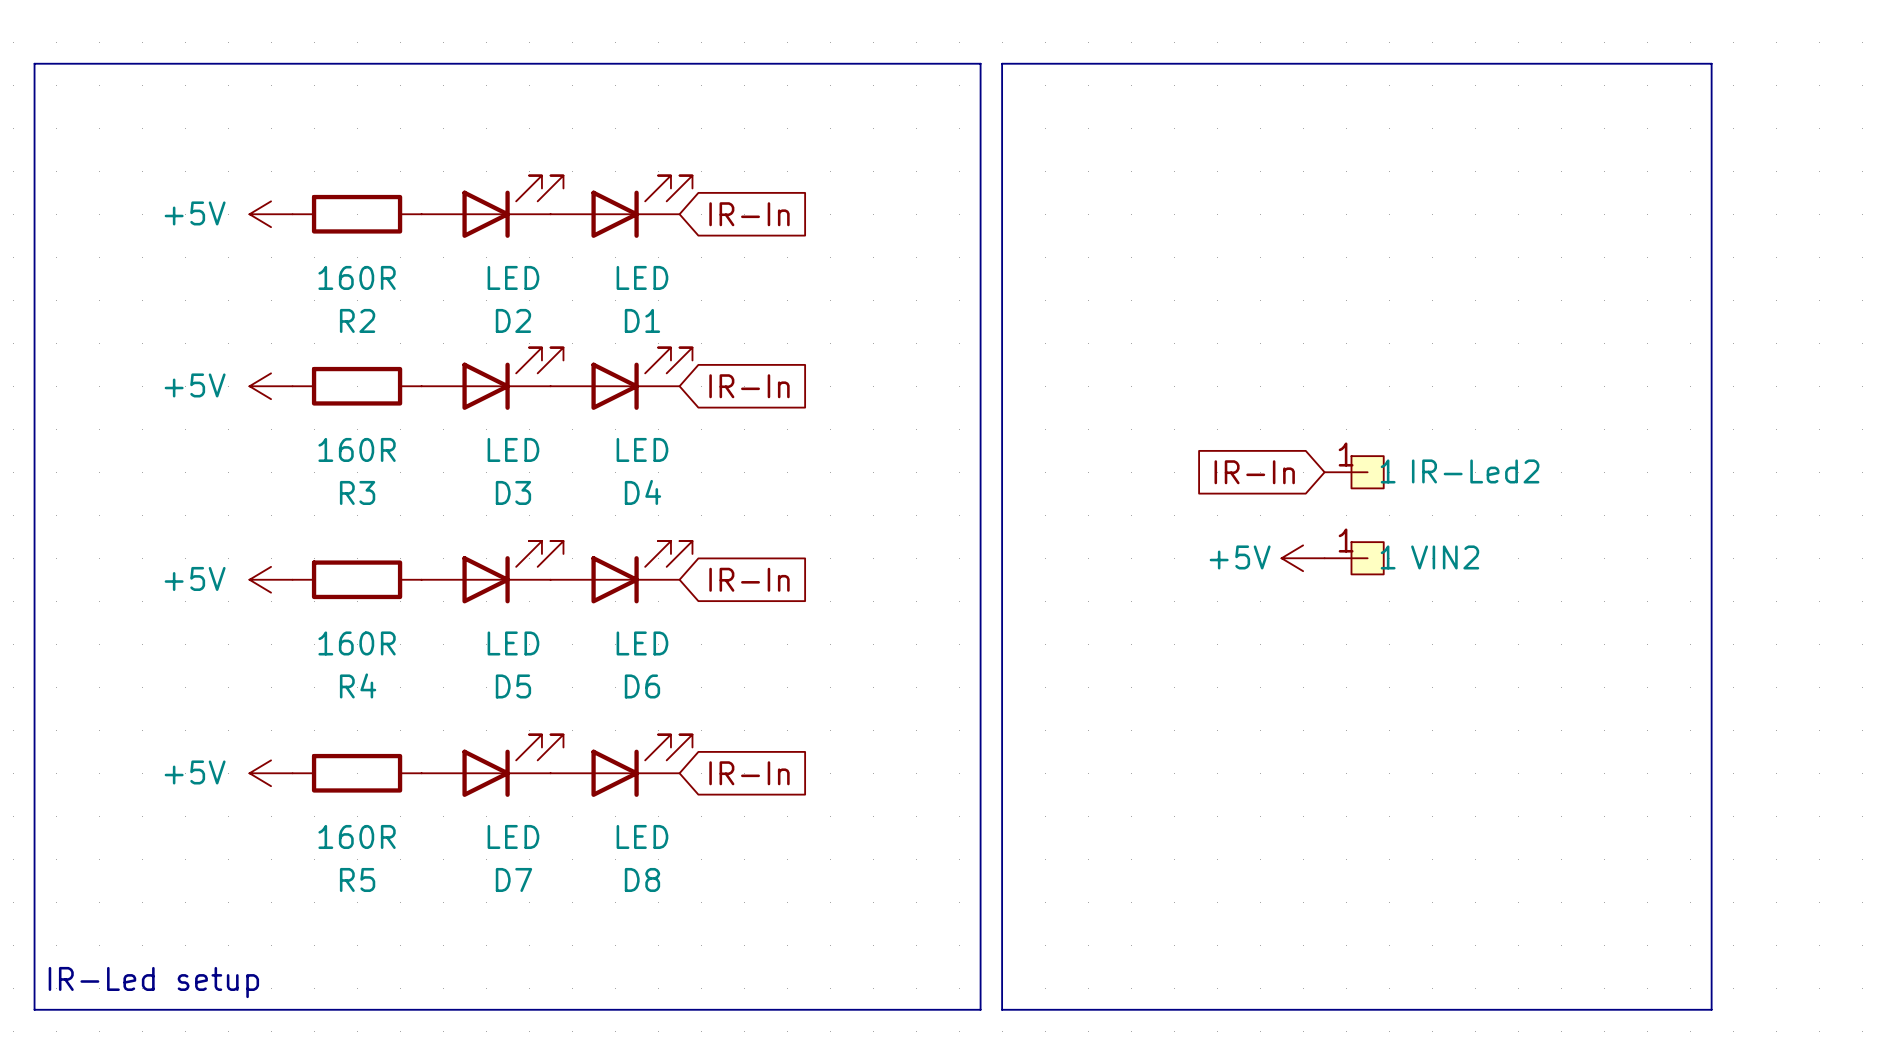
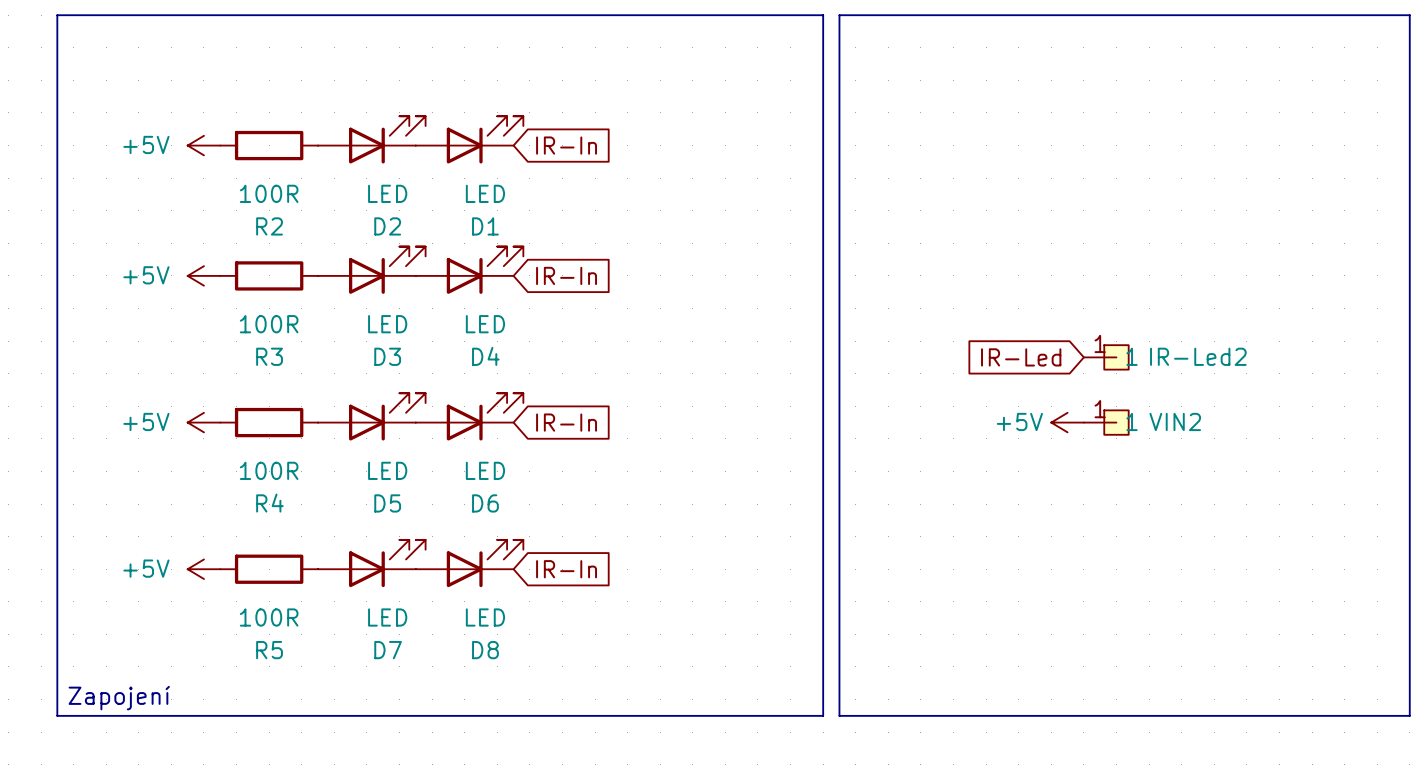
line: (34, 63) (980, 63) (980, 1009) (34, 1009) (34, 63) -> (57, 15) (57, 715) (823, 715) (823, 15) (57, 15)
line: (1002, 63) (1711, 63) (1711, 1009) (1002, 1009) (1002, 63) -> (839, 15) (839, 715) (1409, 715) (1409, 15) (839, 15)
R2 value: 160R (357, 277) -> 100R (269, 193)
R3 value: 160R (357, 449) -> 100R (269, 324)
global label: IR-In (1254, 472) -> none
IR-Led2 position: (1354, 472) -> (1106, 357)
global label: none -> IR-Led (1021, 357)
power symbol position: +5V (1303, 558) -> +5V (1067, 422)
VIN2 position: (1354, 558) -> (1106, 422)
R4 value: 160R (357, 643) -> 100R (269, 470)
R5 value: 160R (357, 836) -> 100R (269, 617)
text: none -> Zapojení (119, 698)
text: IR-Led setup (153, 982) -> none

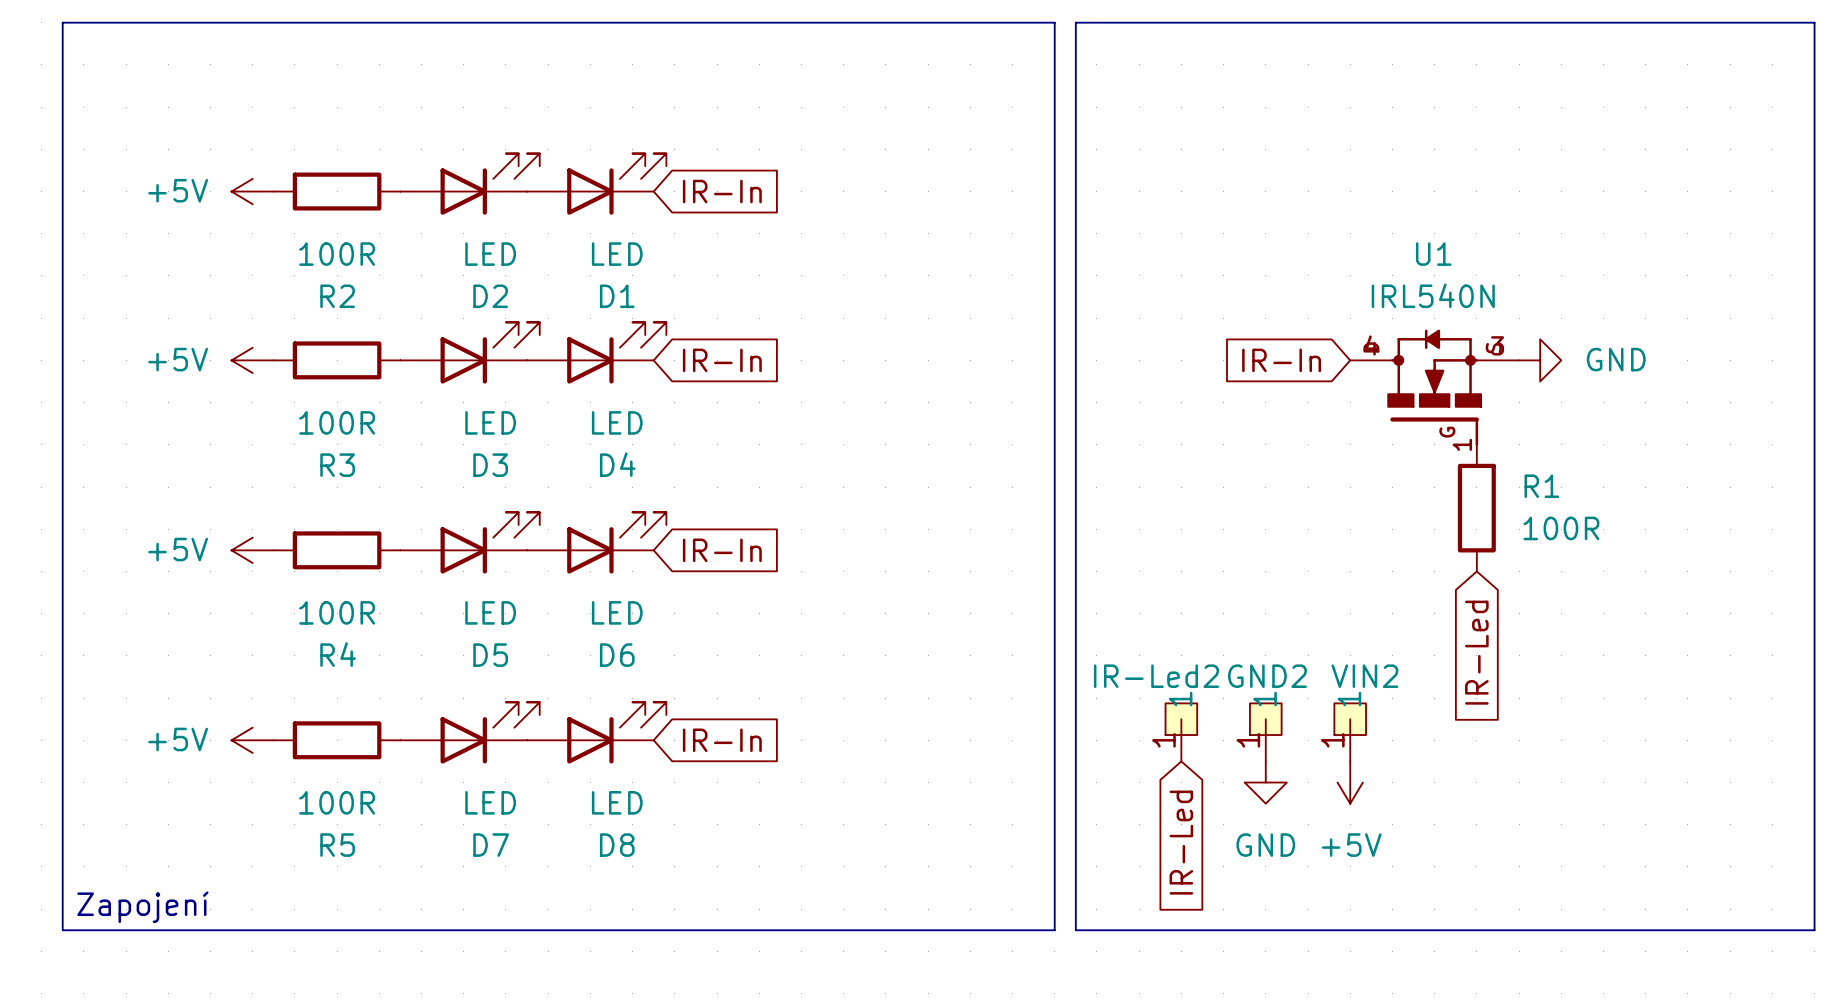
global label: none -> IR-In (1281, 360)
power symbol: none -> GND (1540, 360)
U1: none -> IRL540N (1434, 387)
IR-Led2 name position: IR-Led2 (1198, 356) -> IR-Led2 (1156, 676)
global label rotation: 0° (1021, 357) -> 90° counterclockwise (1476, 652)
global label position: IR-Led (1021, 357) -> IR-Led (1476, 652)
IR-Led2 position: (1106, 357) -> (1181, 732)
IR-Led2 rotation: 0° (1116, 357) -> 90° counterclockwise (1181, 719)
R1: none -> 100R (1476, 508)
VIN2 name position: VIN2 (1175, 421) -> VIN2 (1364, 676)
power symbol rotation: 0° (1067, 422) -> 90° counterclockwise (1350, 782)
power symbol position: +5V (1067, 422) -> +5V (1350, 782)
VIN2 position: (1106, 422) -> (1350, 732)
VIN2 rotation: 0° (1116, 422) -> 90° counterclockwise (1350, 719)
GND2: none -> (1265, 732)
power symbol: none -> GND (1265, 782)
global label: none -> IR-Led (1181, 842)

